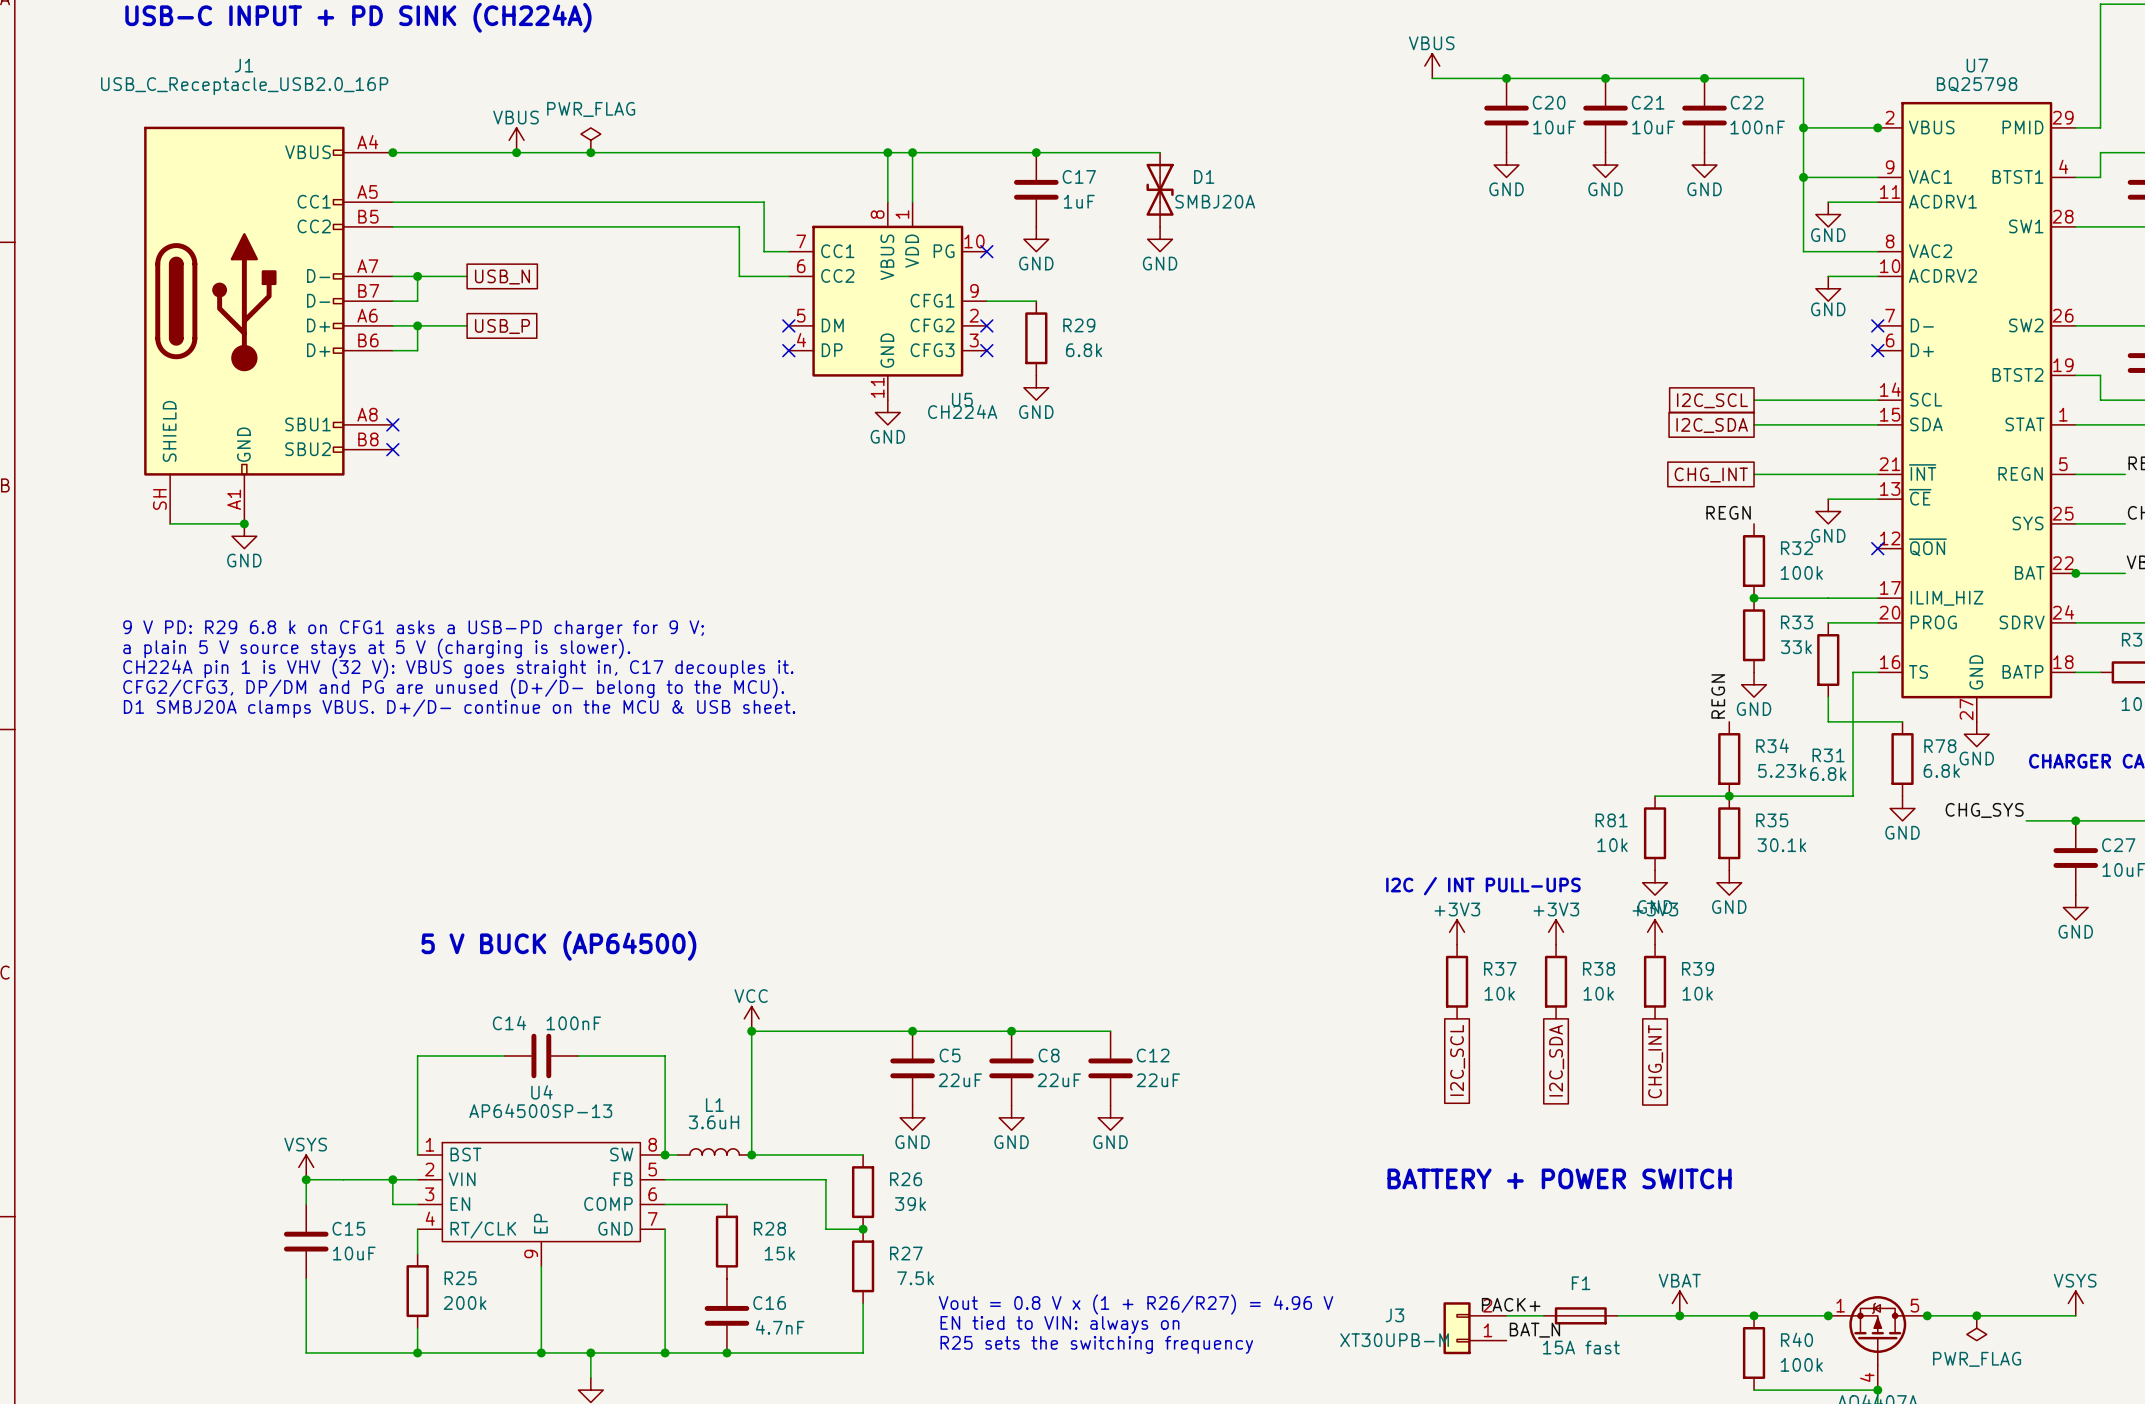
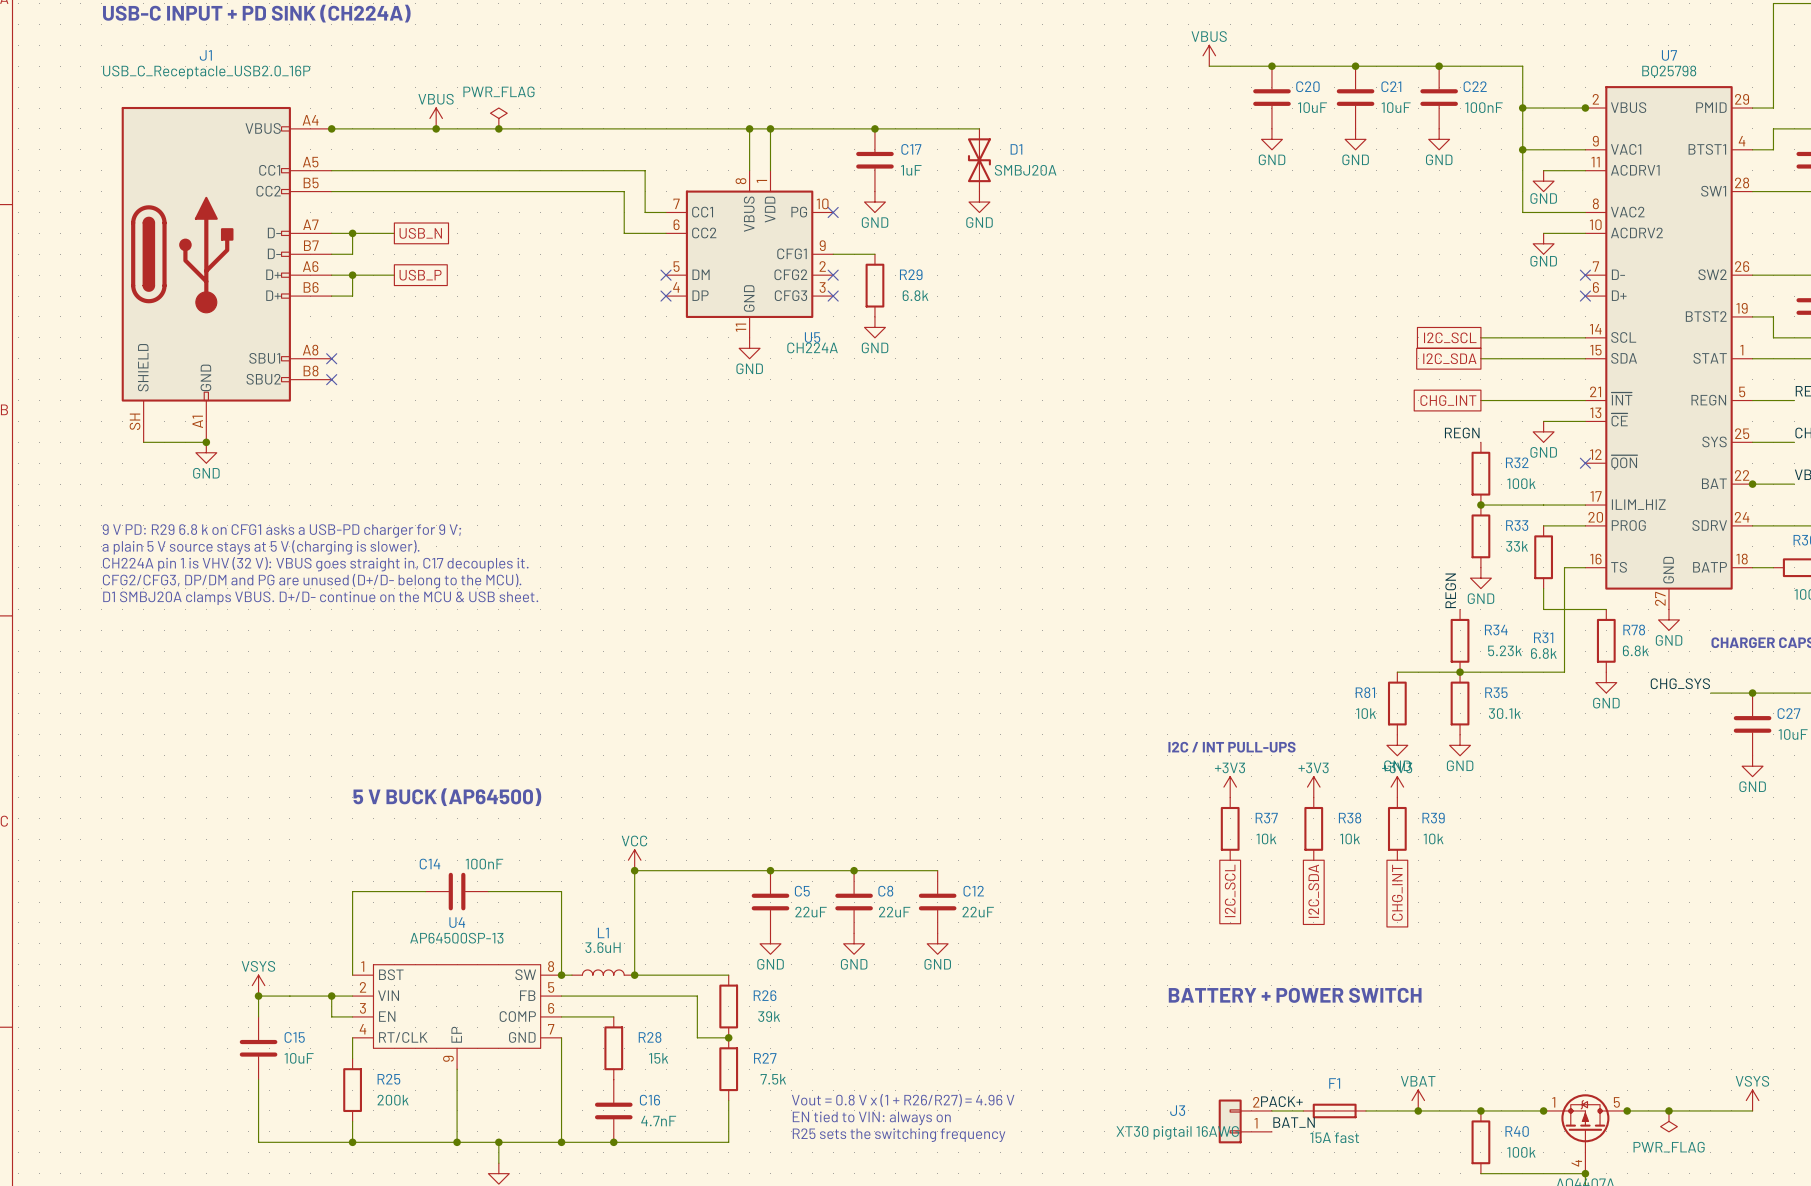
J3 value: XT30UPB-M (1394, 1340) -> XT30 pigtail 16AWG (1177, 1132)

